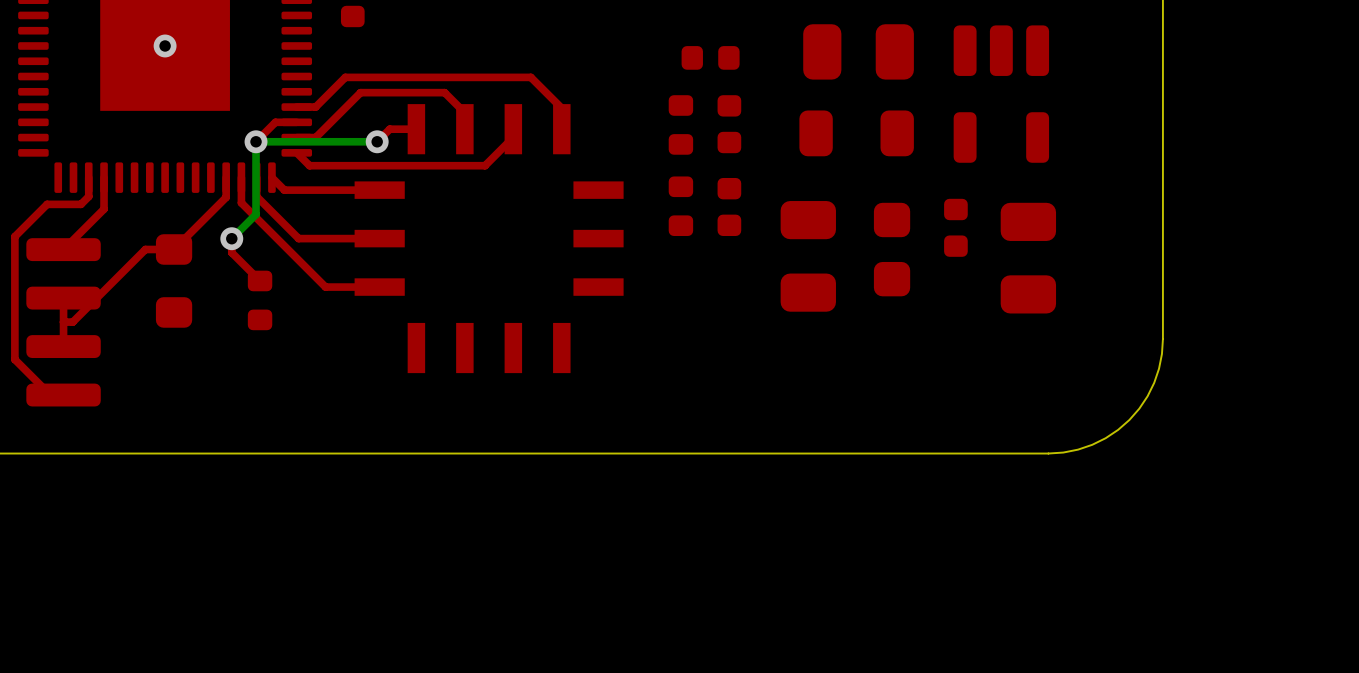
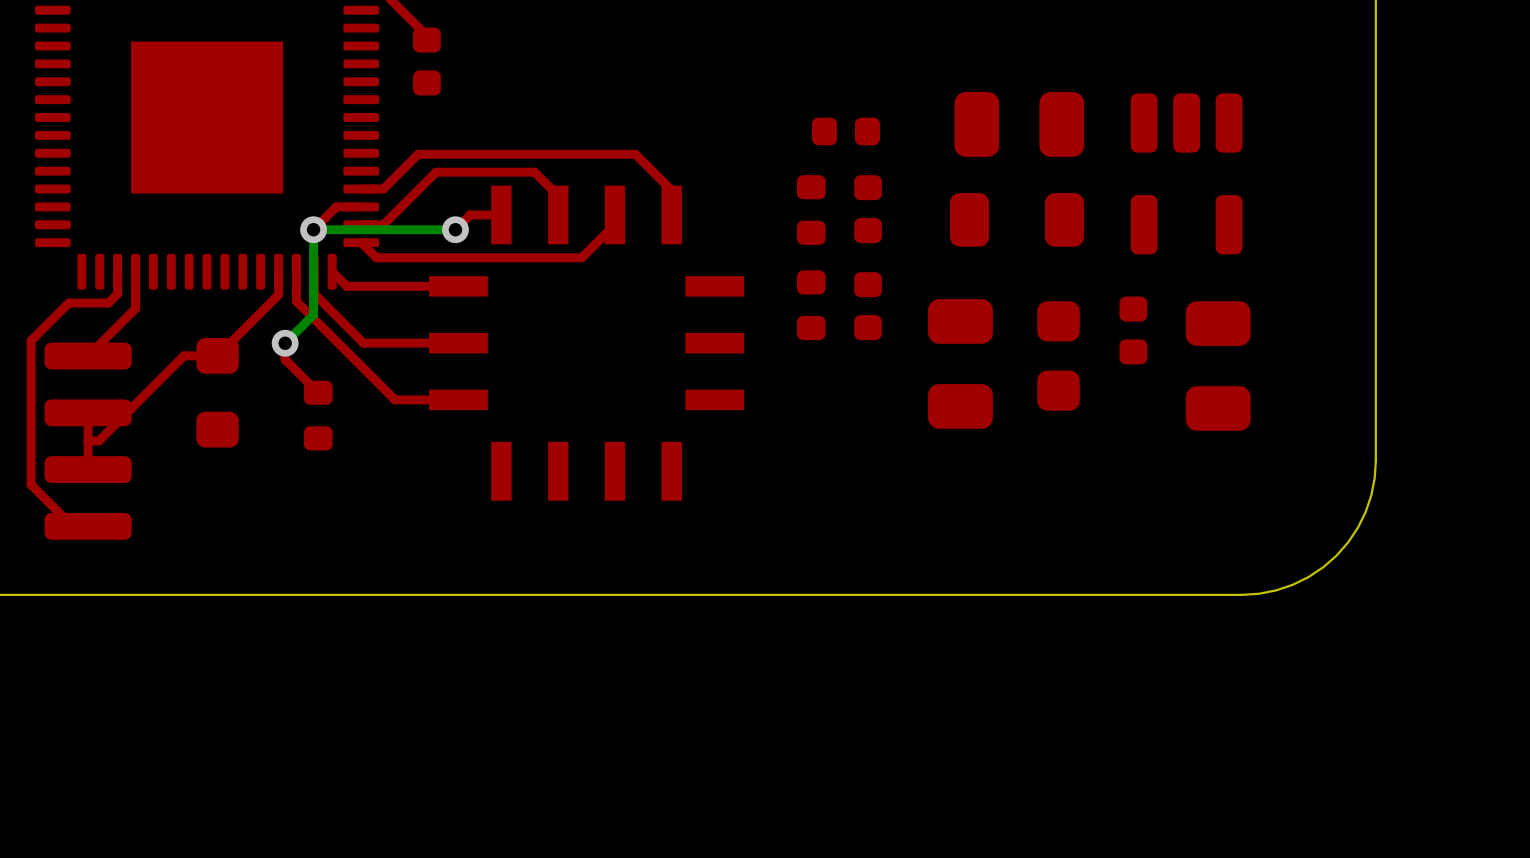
via: (165, 45) -> none

